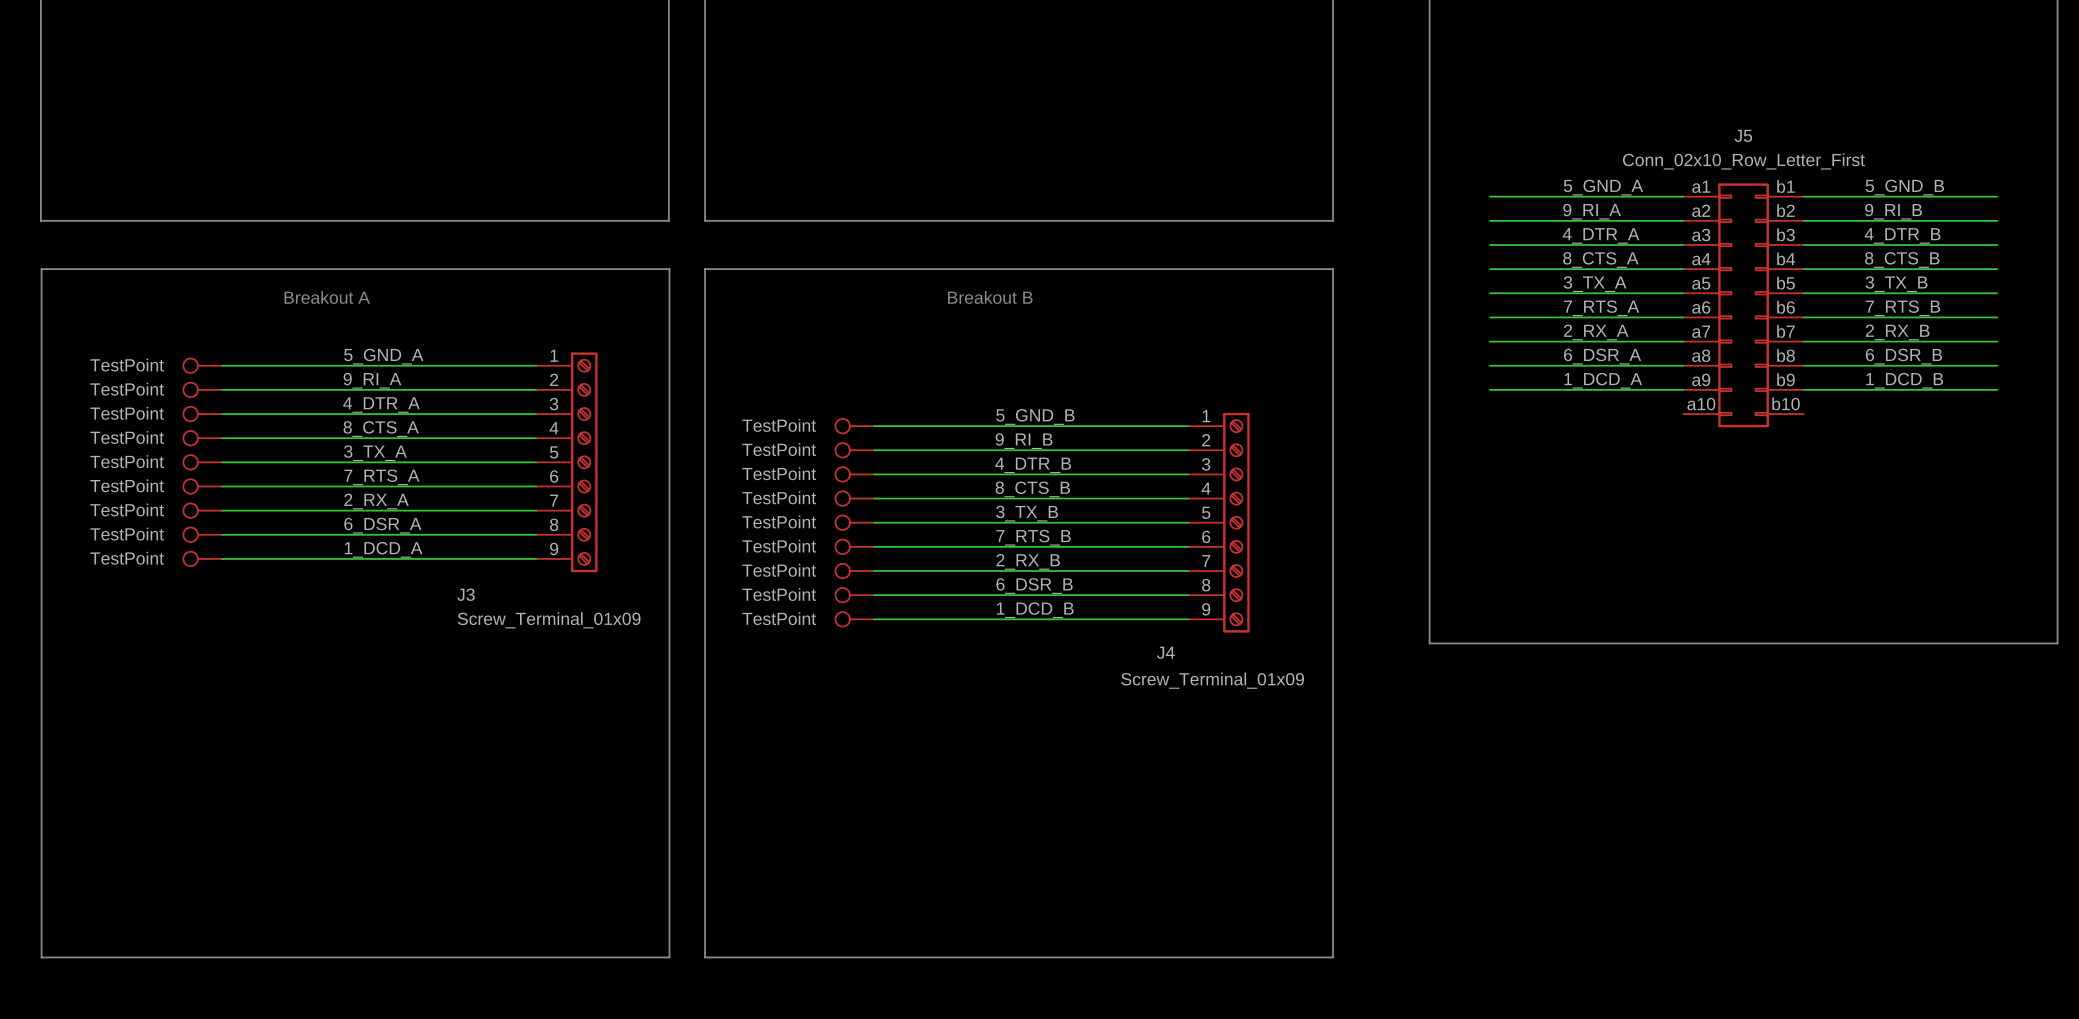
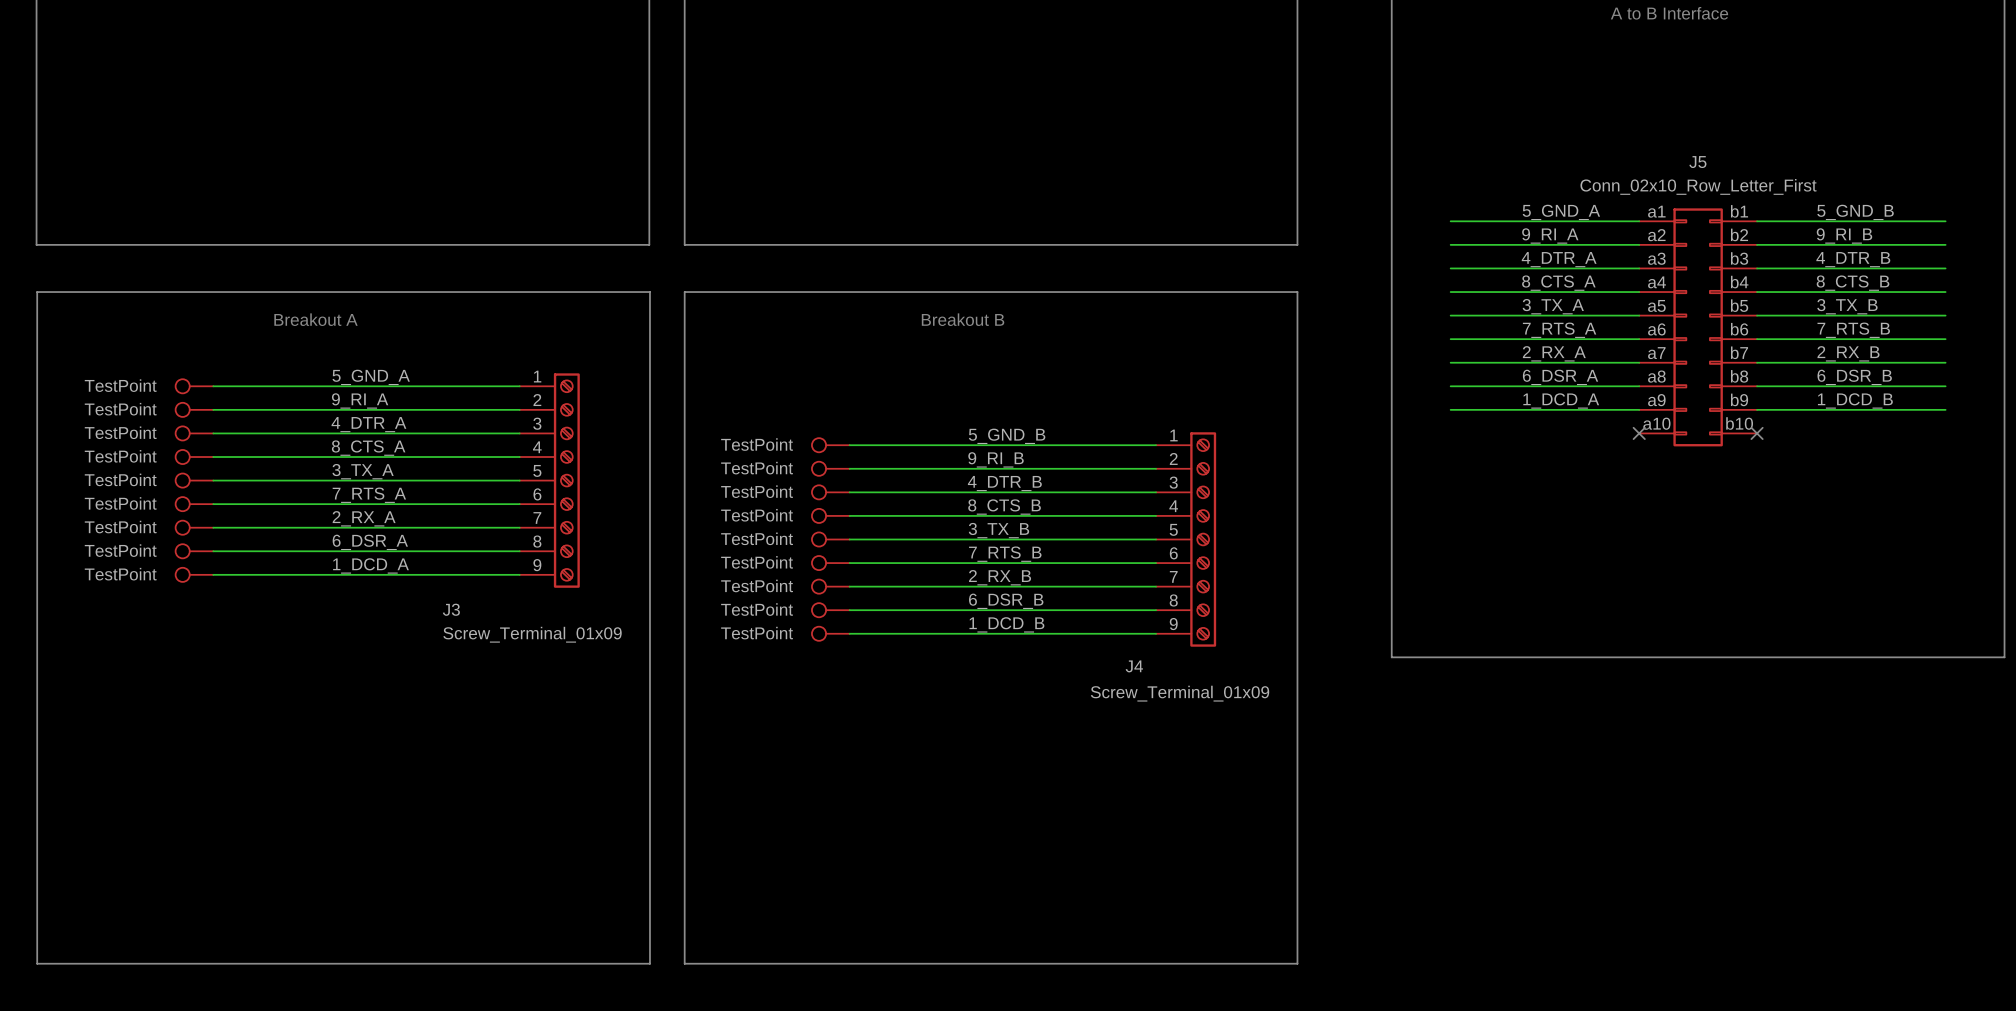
no-connect mark: none -> (1639, 433)
no-connect mark: none -> (1757, 433)

